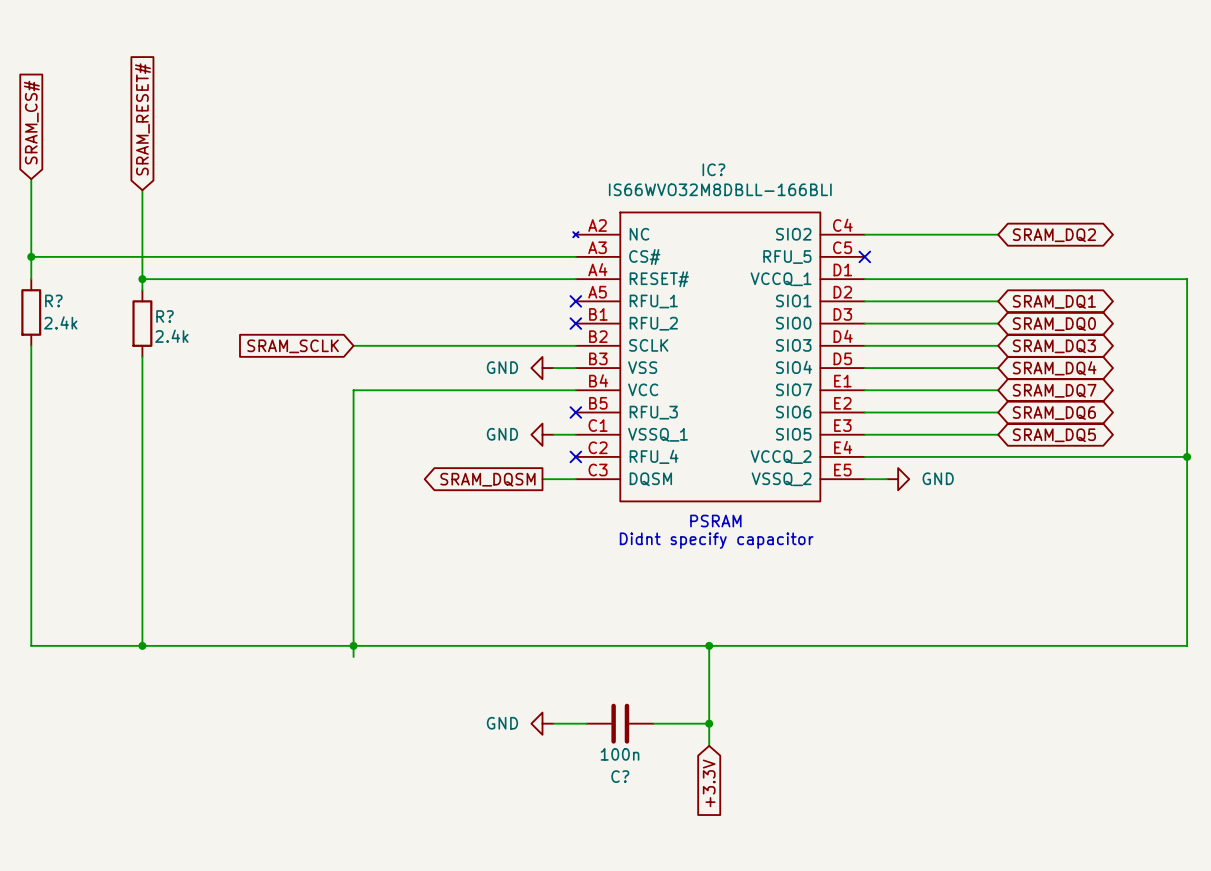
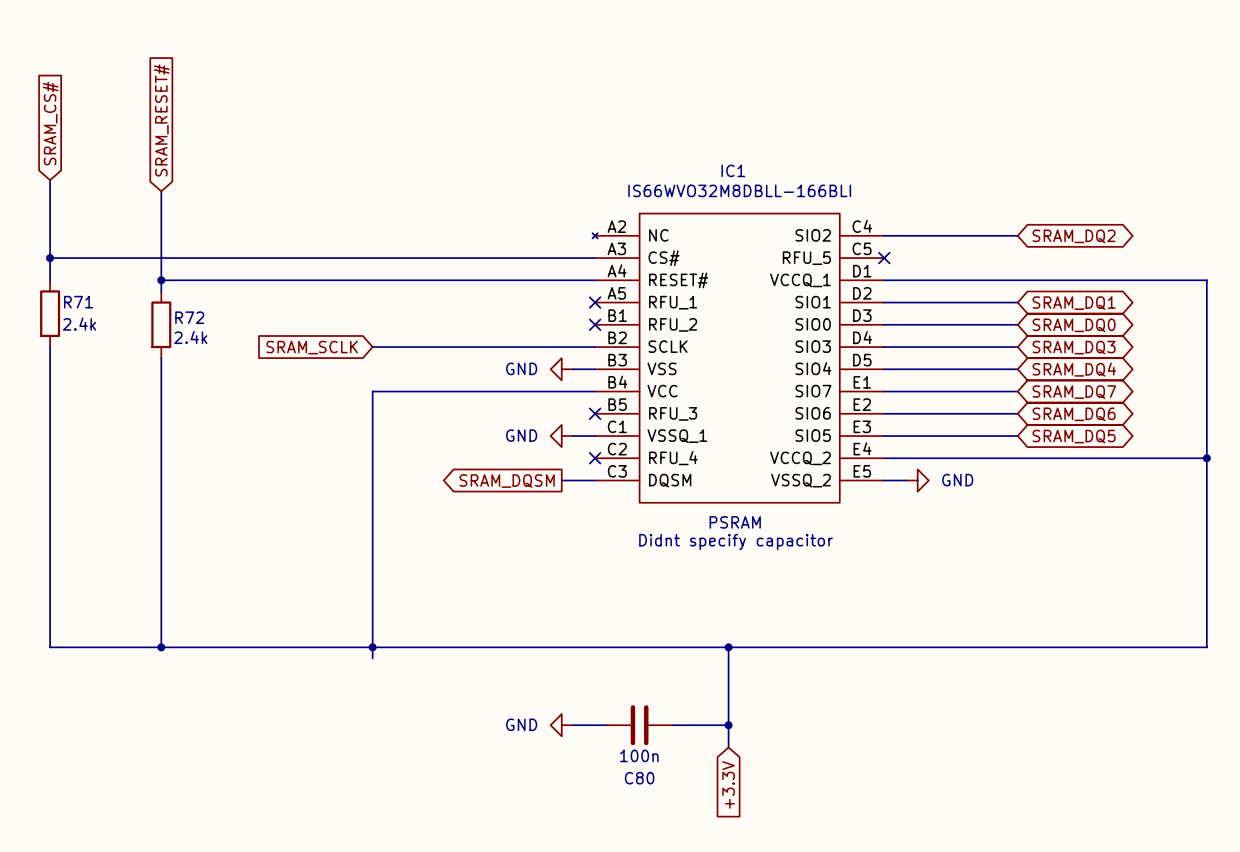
IC? name: IC? (713, 169) -> IC1 (733, 170)
R? name: R? (53, 300) -> R71 (78, 302)
R? name: R? (164, 316) -> R72 (189, 317)
C? name: C? (620, 776) -> C80 (639, 778)

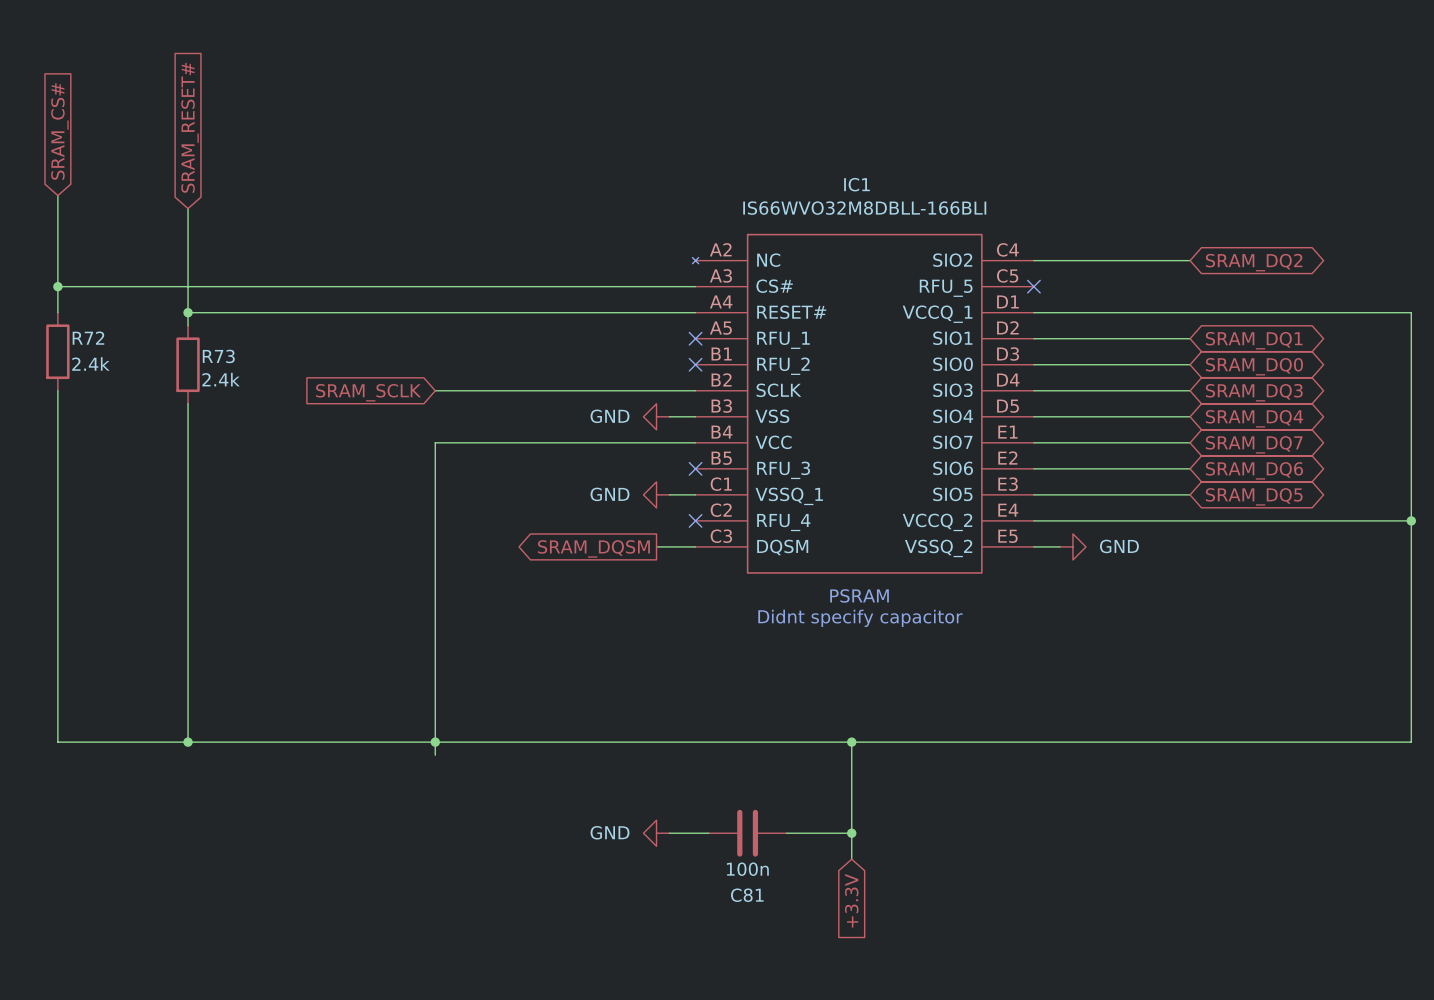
R71 name: R71 (78, 302) -> R72 (88, 338)
R72 name: R72 (189, 317) -> R73 (218, 356)
C80 name: C80 (639, 778) -> C81 (747, 895)

